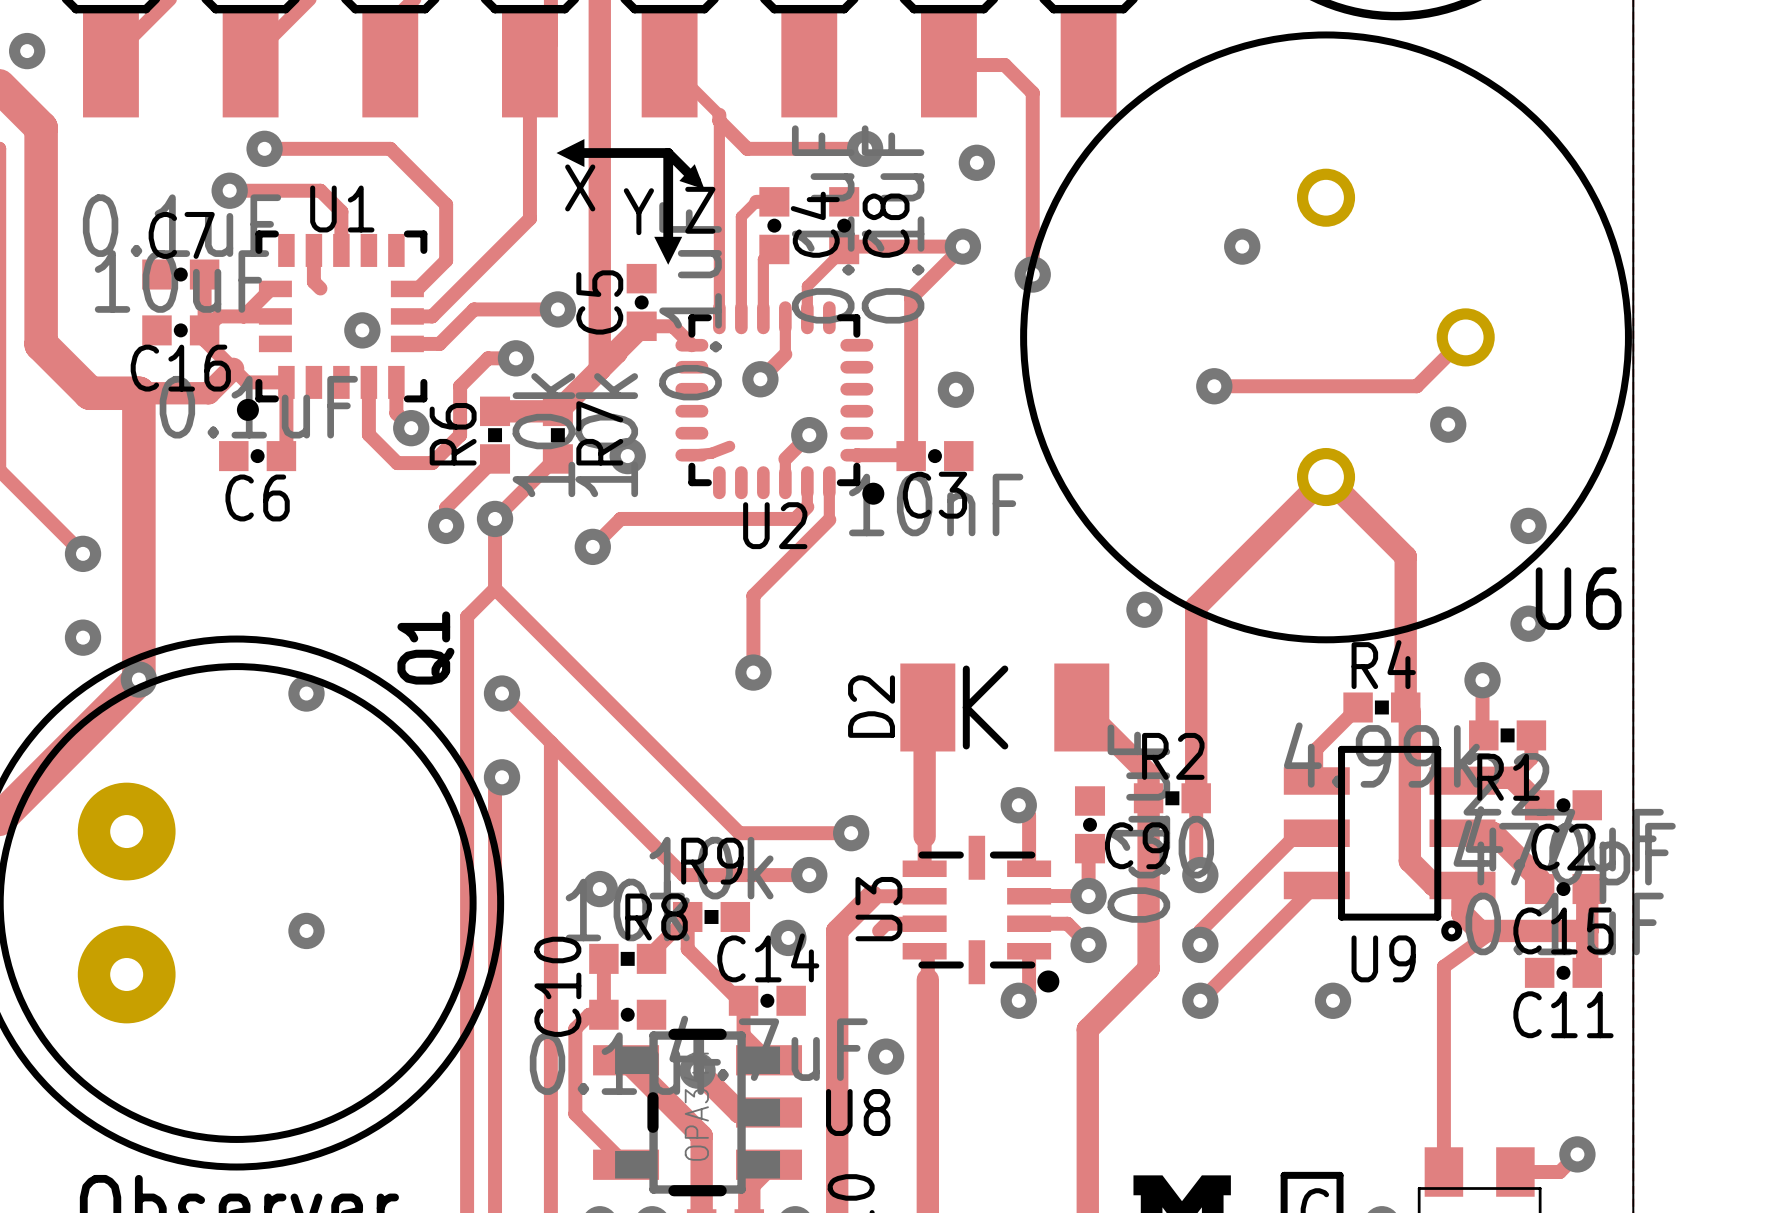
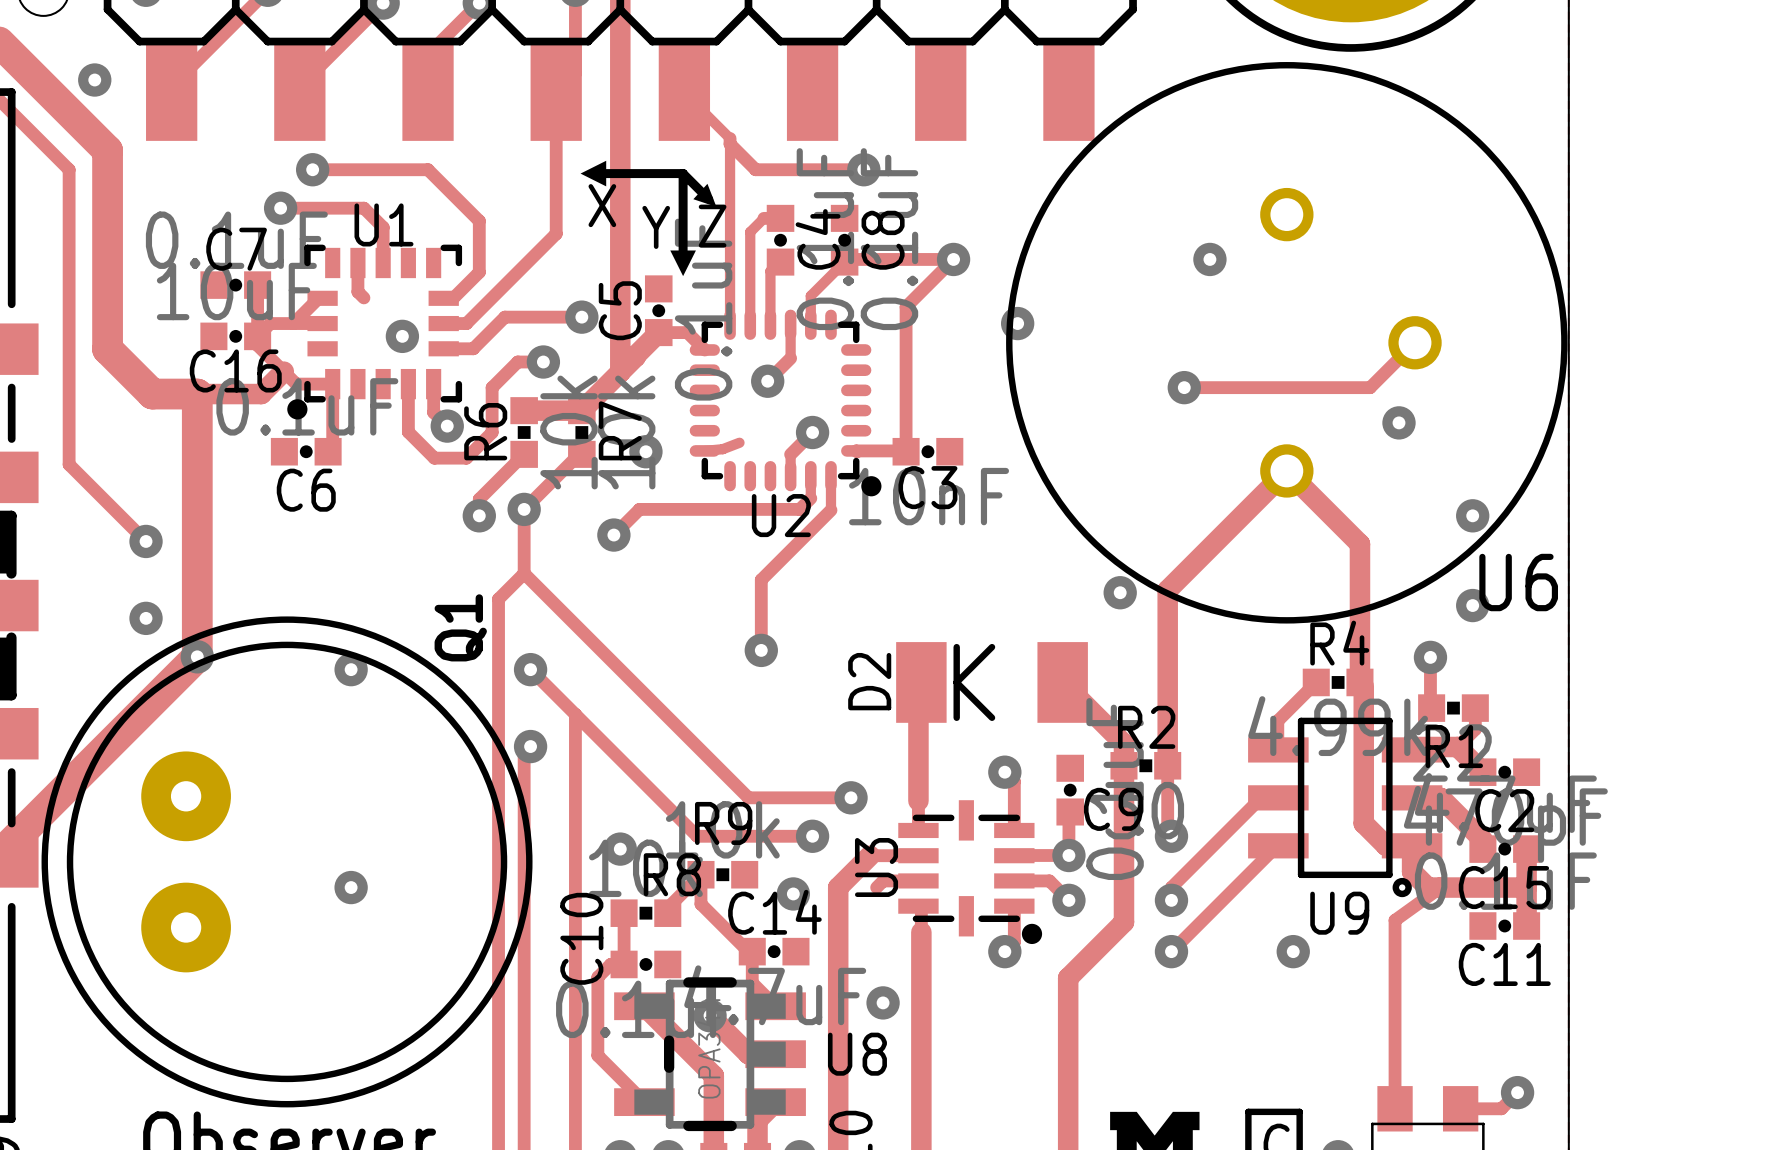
track: (948, 65) (1004, 65) (1032, 92) (1032, 274) -> none
via: (976, 162) -> none
via position: (1032, 274) -> (1017, 323)
via: (955, 389) -> none

